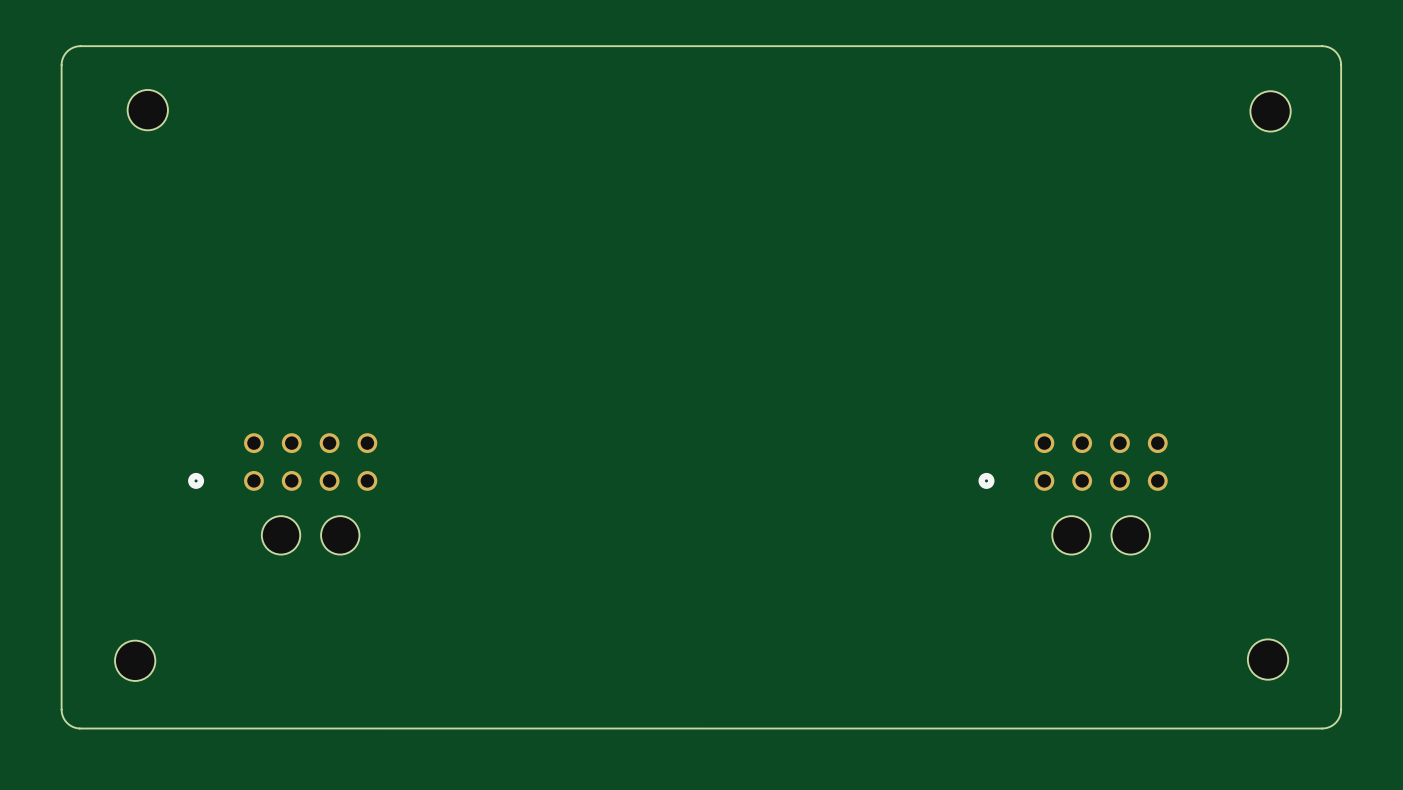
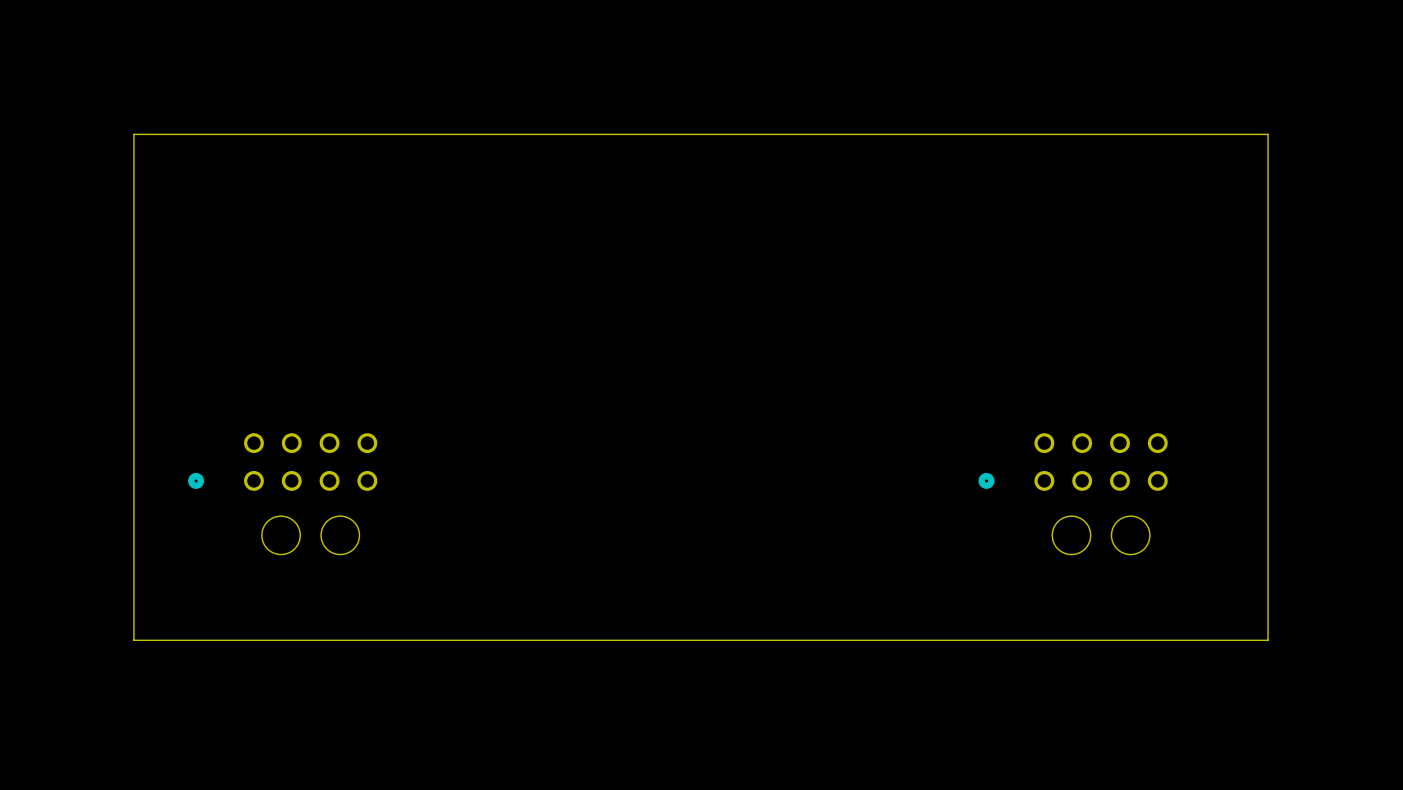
part: (147, 110) -> none
part: (1270, 111) -> none
part: (1268, 659) -> none
part: (135, 660) -> none
board edge: (1322, 728) (79, 728) (70, 725) (64, 718) (61, 709) (61, 65) (64, 55) (71, 48) (80, 46) (1322, 46) (1331, 48) (1338, 55) (1341, 65) (1341, 709) (1335, 723) (1322, 728) -> (1268, 134) (1268, 640) (133, 640) (133, 134) (1268, 134)

